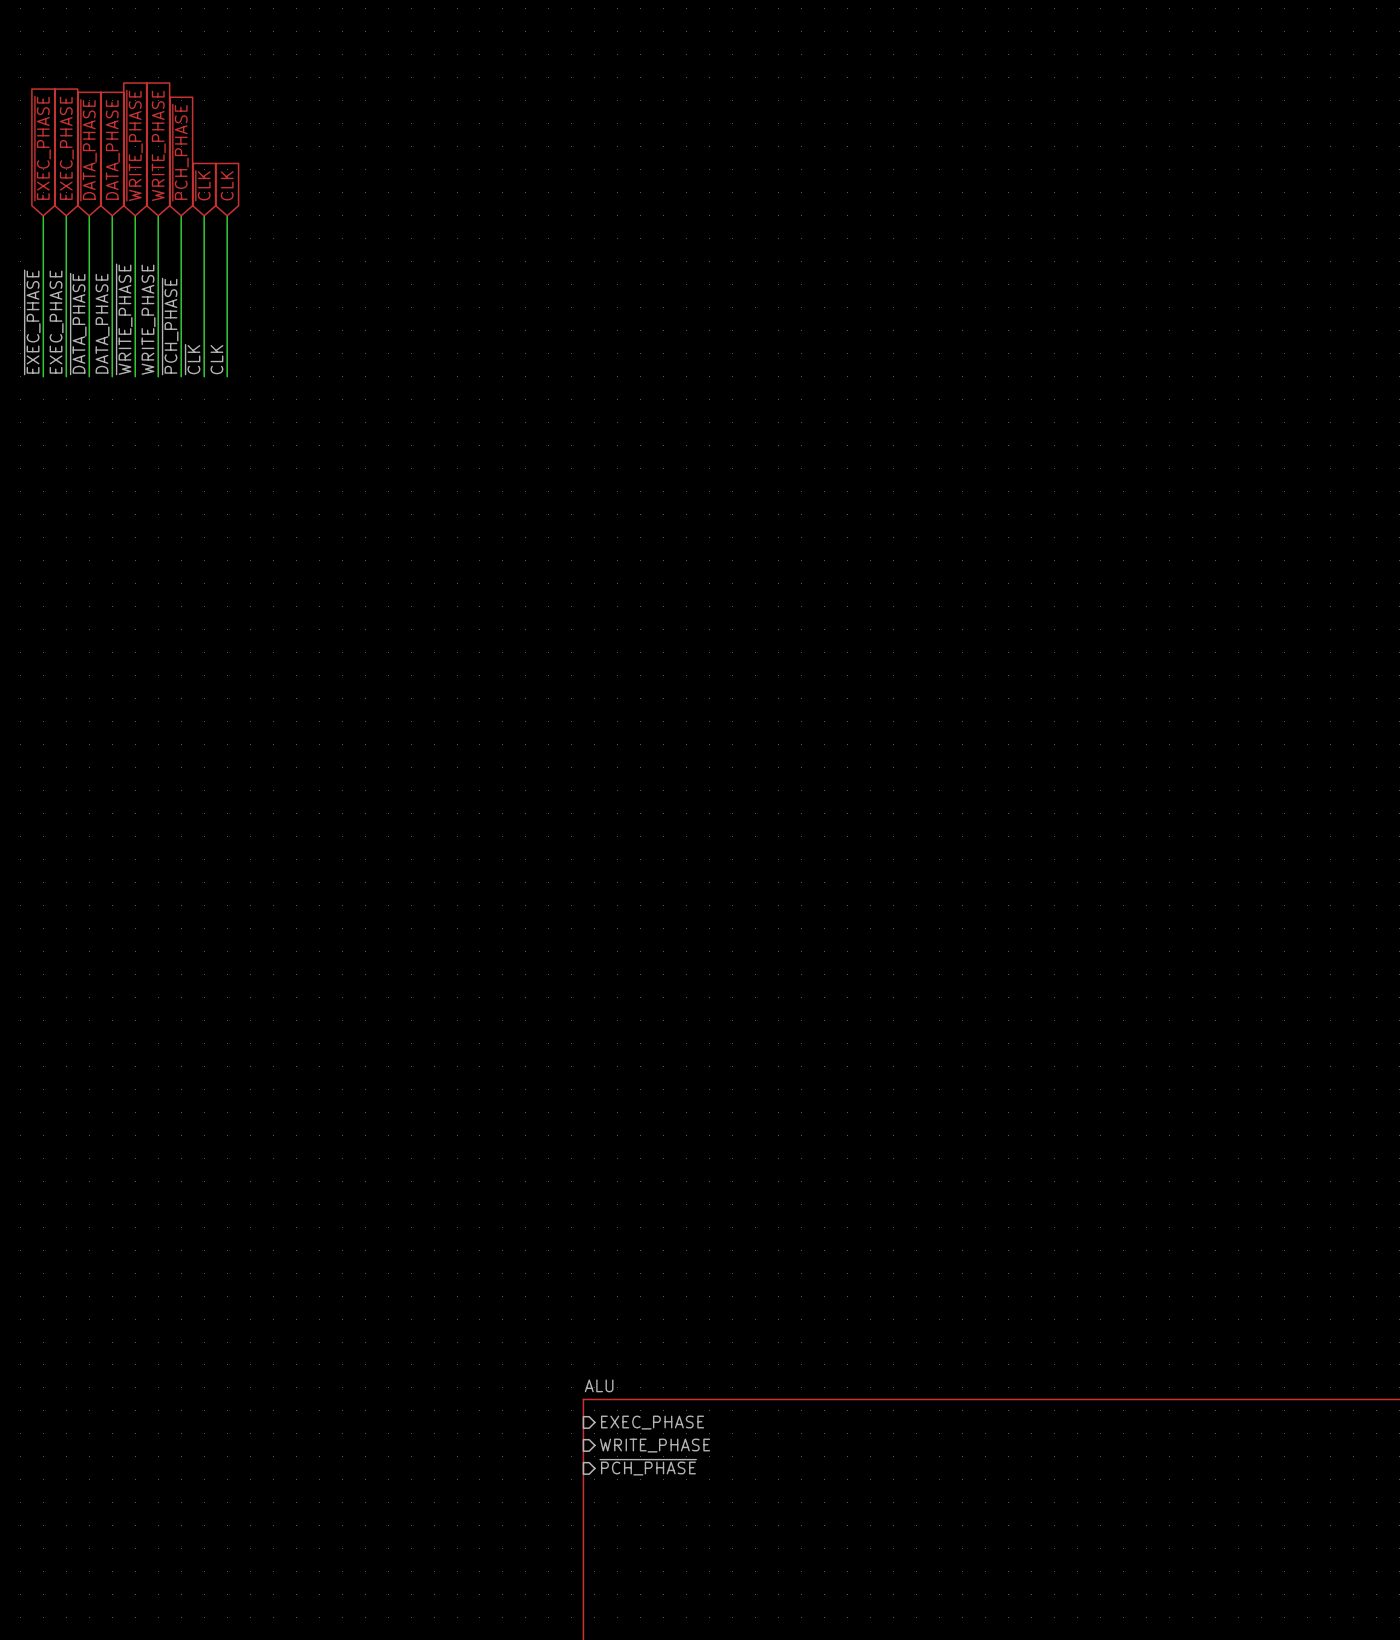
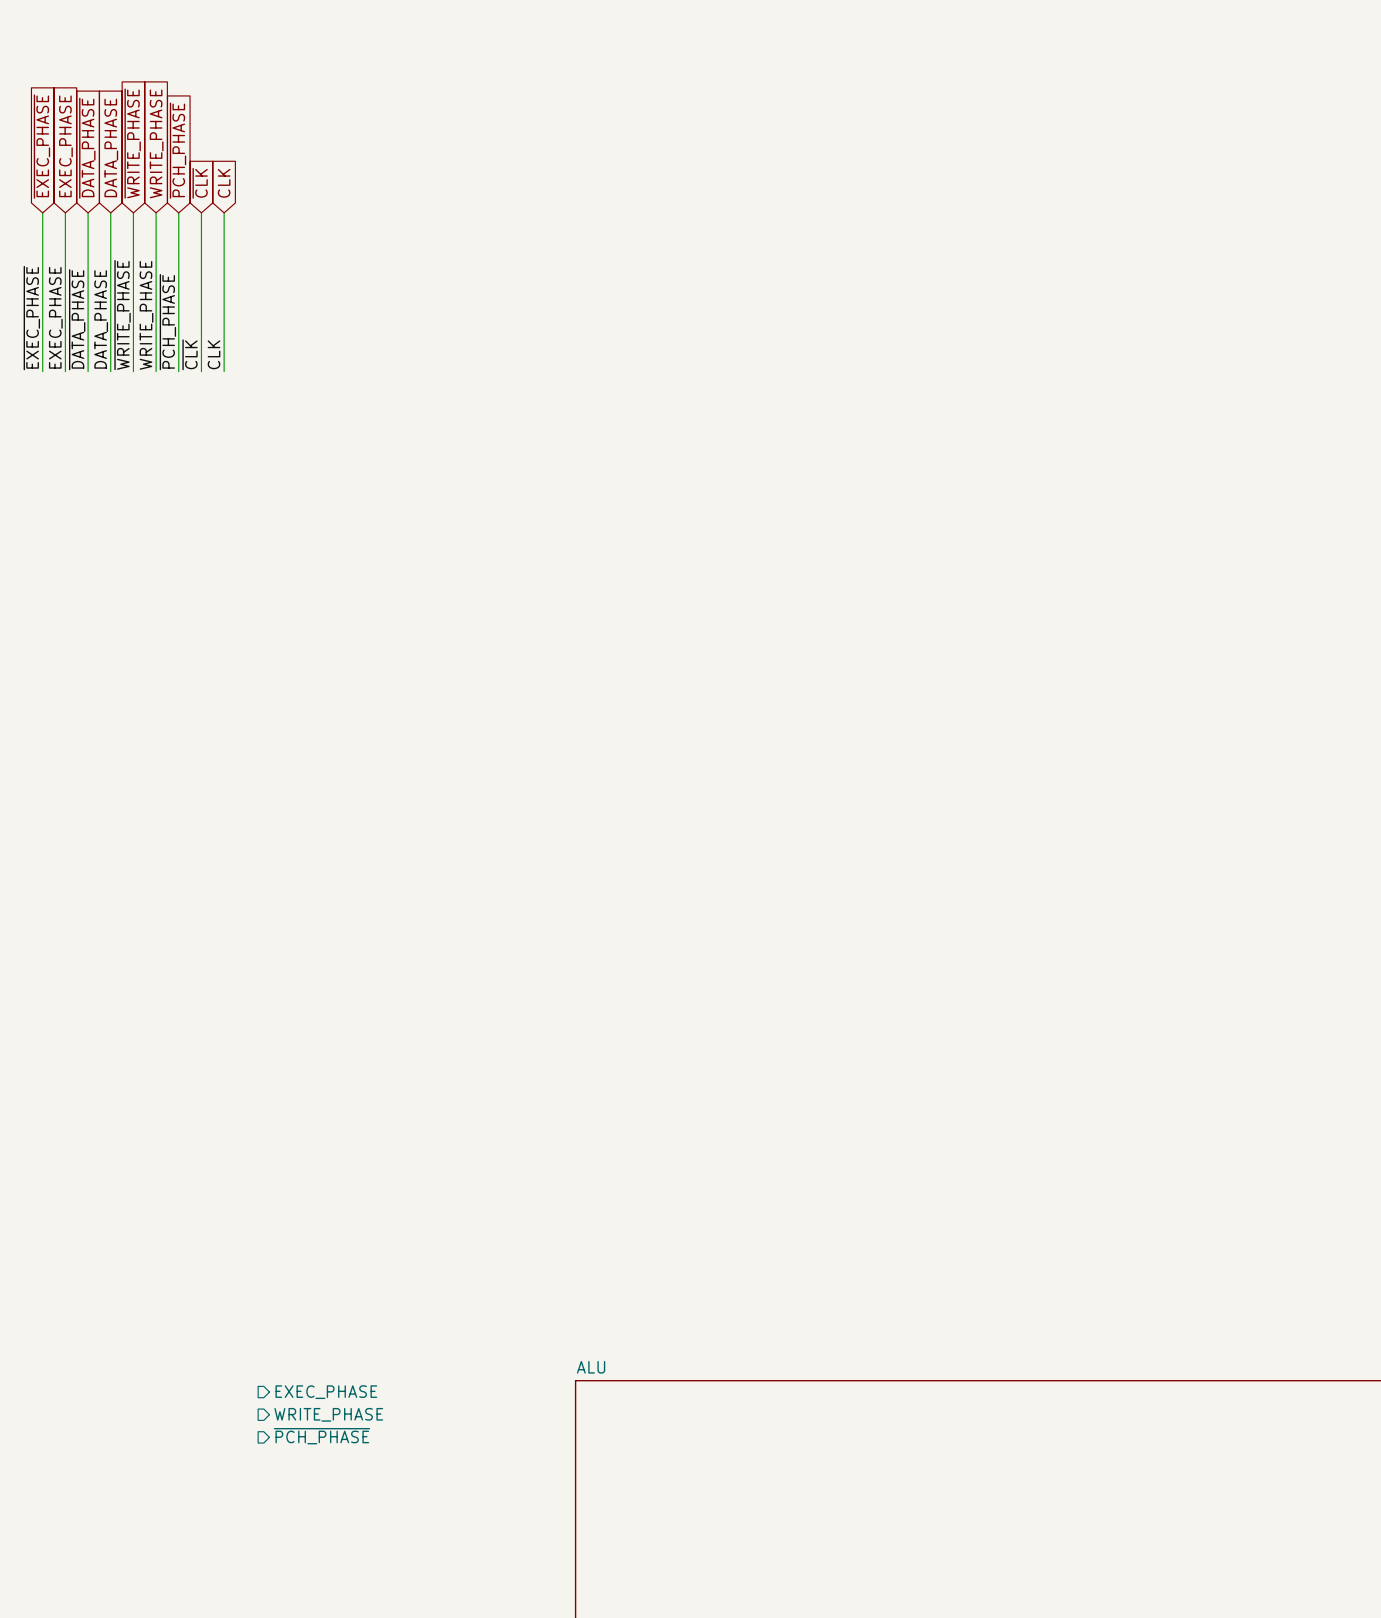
sheet pin: none -> EXEC_PHASE (326, 1392)
sheet pin: EXEC_PHASE (652, 1422) -> none
sheet pin: none -> WRITE_PHASE (328, 1414)
sheet pin: WRITE_PHASE (655, 1445) -> none
sheet pin: none -> ~{PCH_PHASE} (322, 1436)
sheet pin: ~{PCH_PHASE} (648, 1467) -> none

